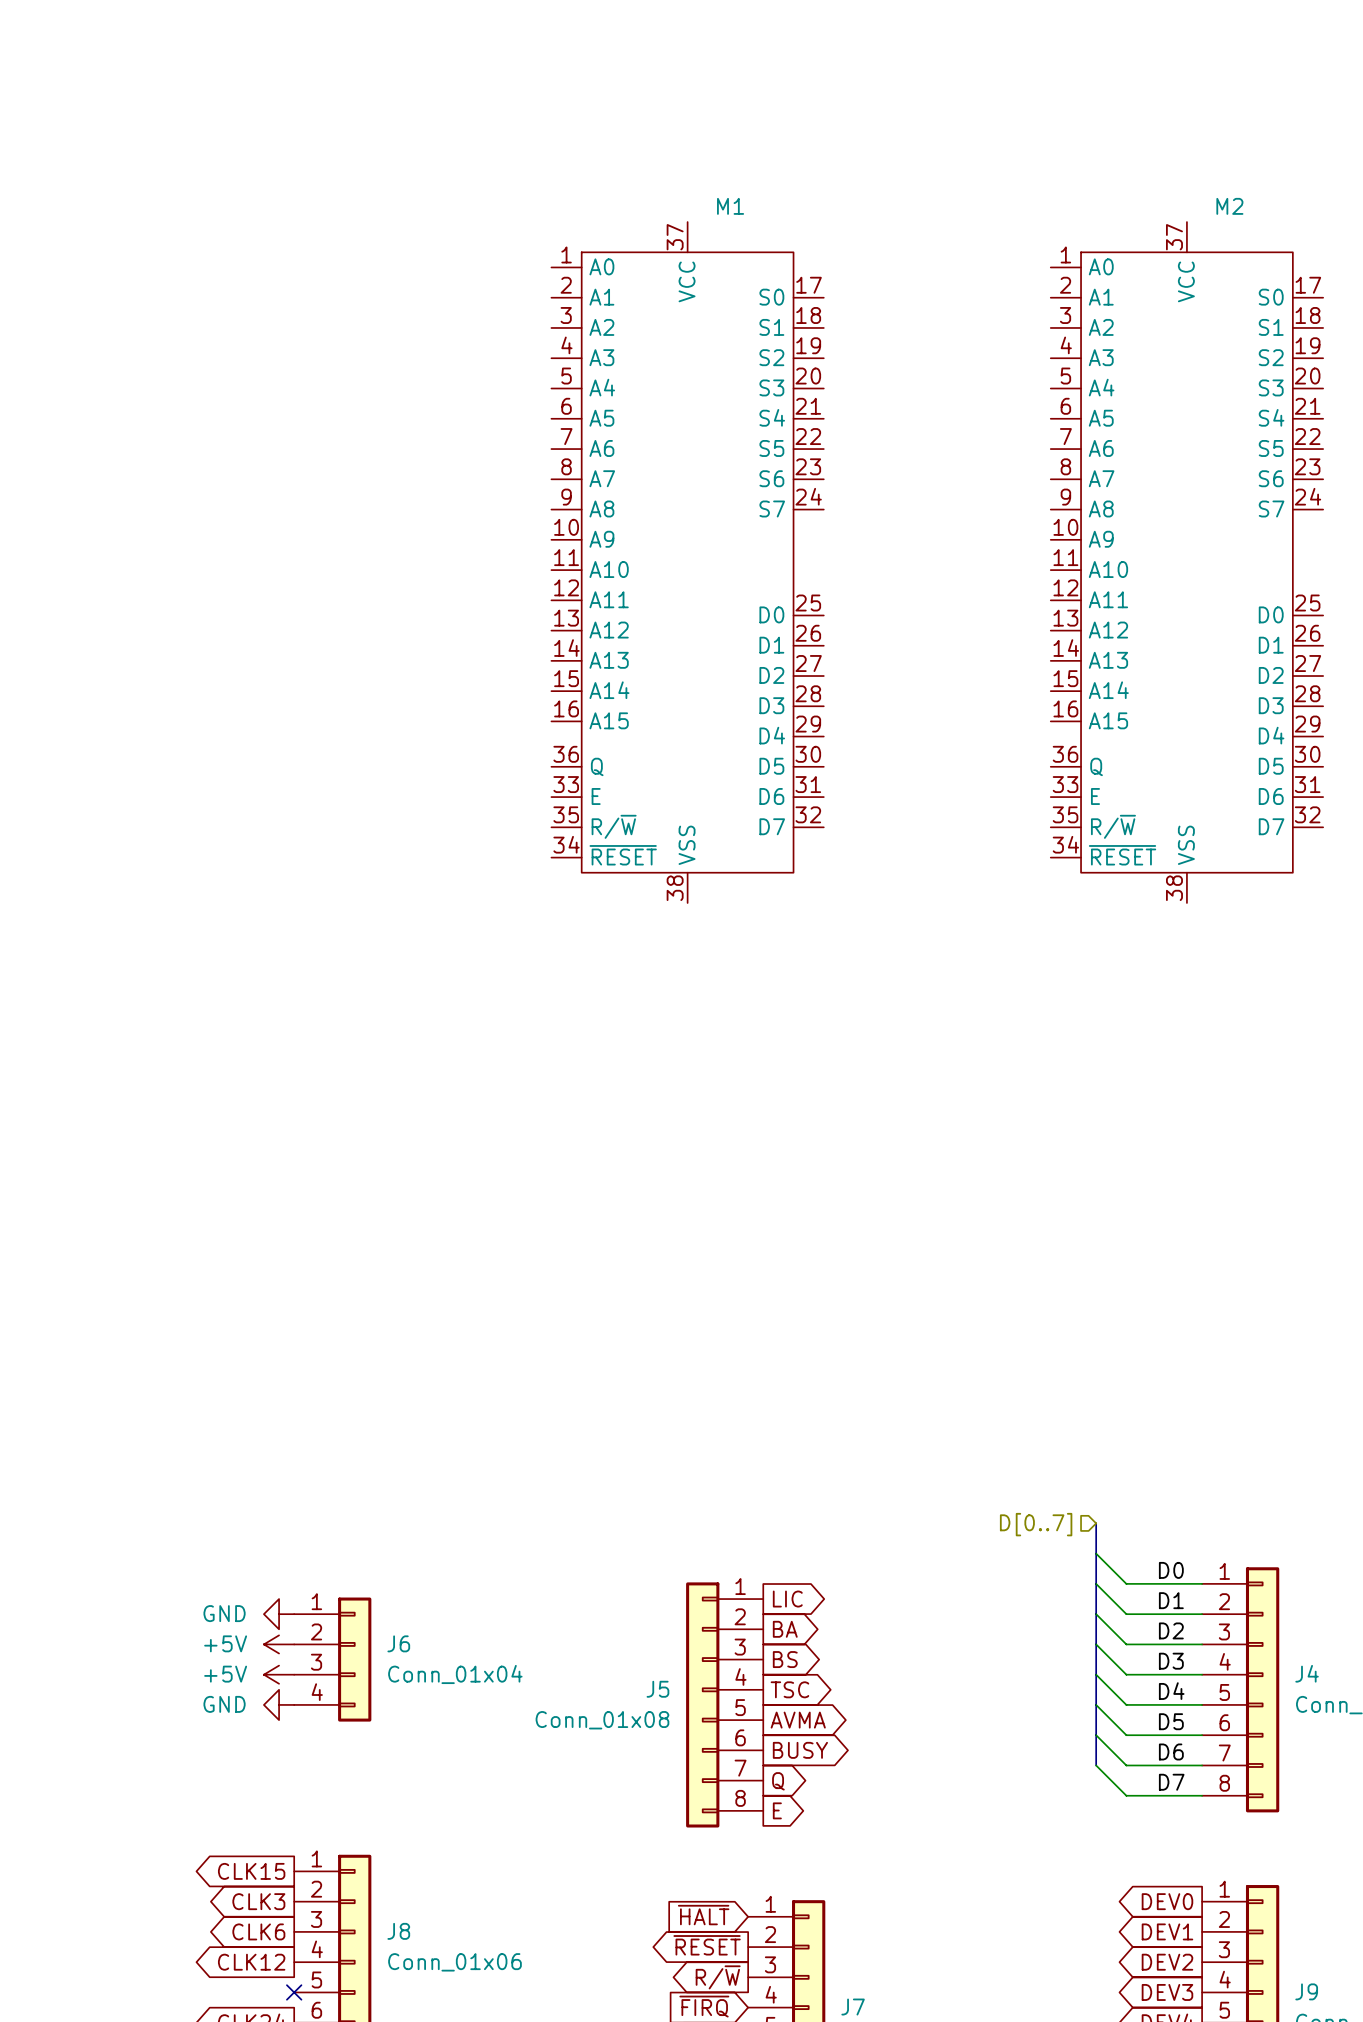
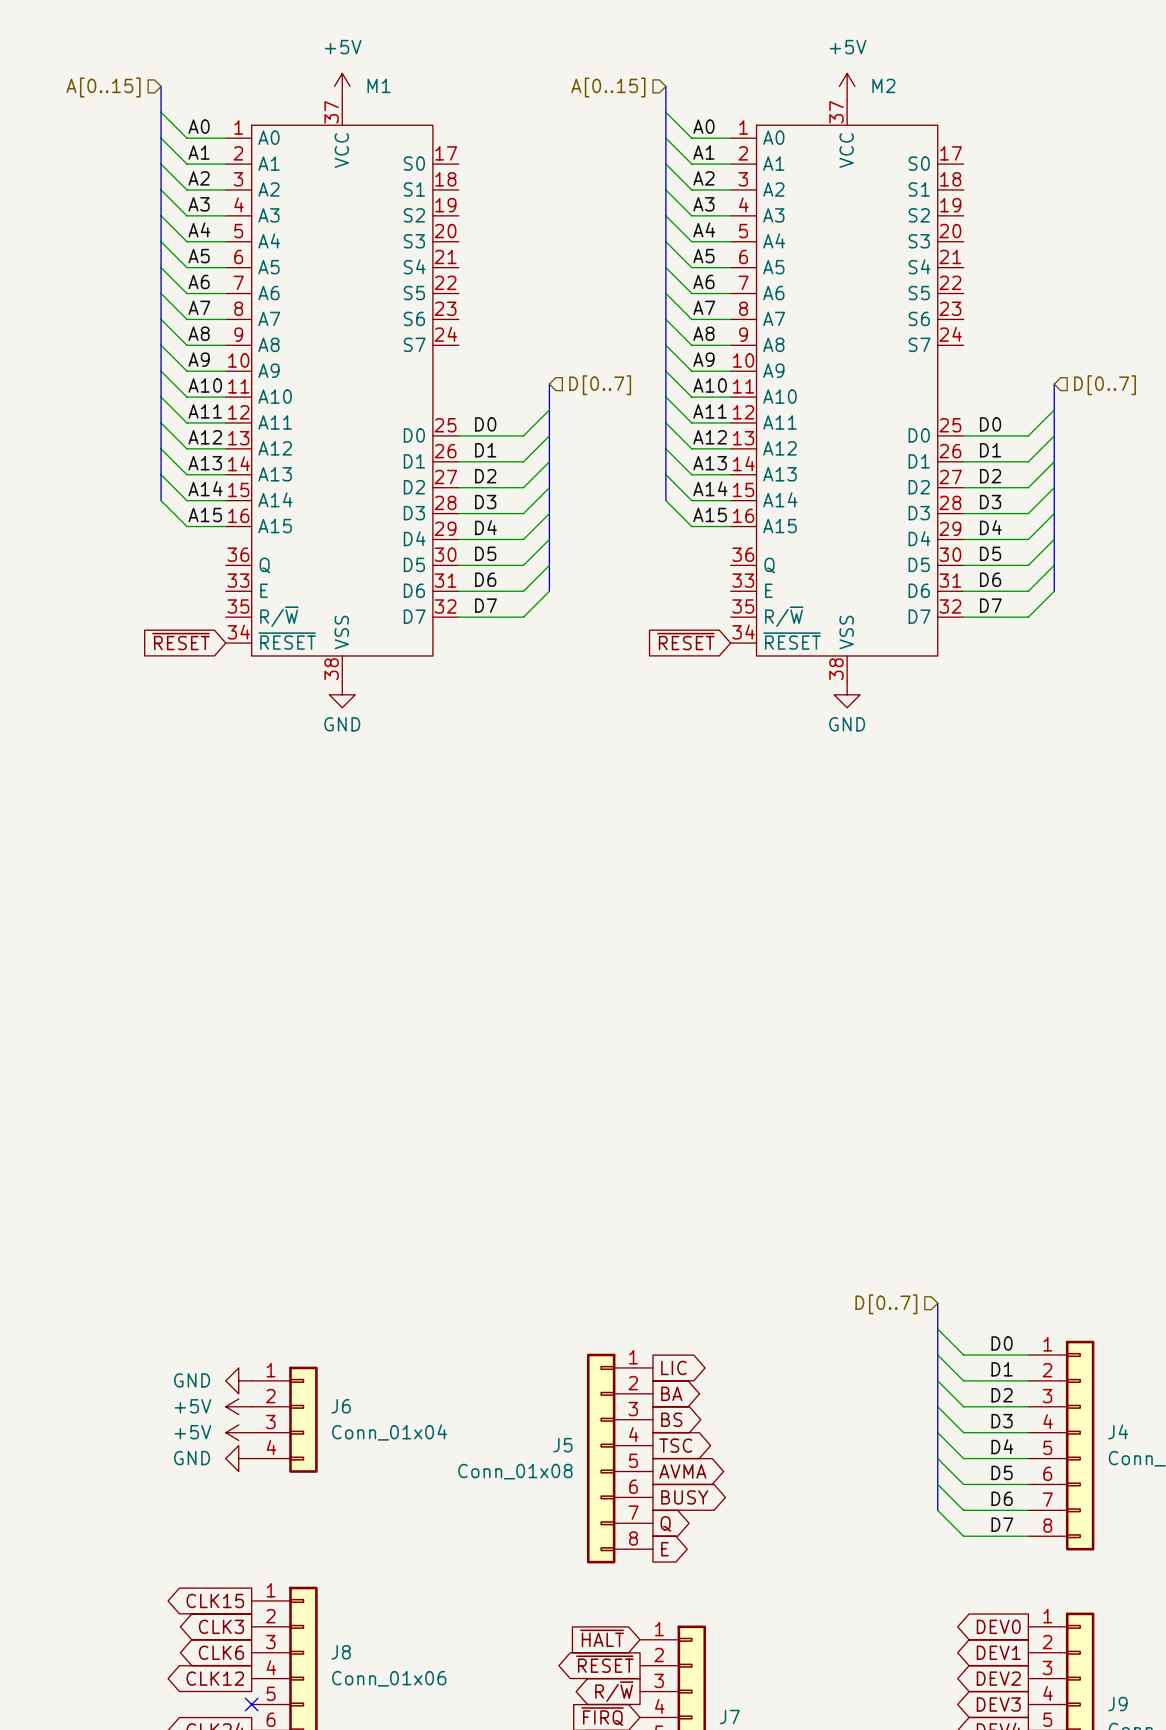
bus: none -> (161, 86) (161, 500)
power symbol: none -> +5V (342, 86)
bus: none -> (665, 86) (665, 500)
power symbol: none -> +5V (847, 86)
hierarchical label: none -> A[0..15] (103, 87)
hierarchical label: none -> A[0..15] (608, 87)
wire: none -> (161, 112) (186, 138) (225, 138)
wire: none -> (665, 112) (691, 138) (730, 138)
label: none -> A0 (199, 126)
label: none -> A0 (703, 126)
wire: none -> (161, 138) (186, 164) (225, 164)
wire: none -> (665, 138) (691, 164) (730, 164)
label: none -> A1 (199, 152)
label: none -> A1 (703, 152)
wire: none -> (161, 164) (186, 189) (225, 189)
wire: none -> (665, 164) (691, 189) (730, 189)
label: none -> A2 (199, 178)
label: none -> A2 (703, 178)
wire: none -> (161, 189) (186, 215) (225, 215)
wire: none -> (665, 189) (691, 215) (730, 215)
label: none -> A3 (199, 204)
label: none -> A3 (703, 204)
wire: none -> (161, 215) (186, 241) (225, 241)
wire: none -> (665, 215) (691, 241) (730, 241)
label: none -> A4 (199, 229)
label: none -> A4 (704, 229)
wire: none -> (161, 241) (186, 267) (225, 267)
wire: none -> (665, 241) (691, 267) (730, 267)
label: none -> A5 (199, 256)
label: none -> A5 (703, 256)
wire: none -> (161, 267) (186, 293) (225, 293)
wire: none -> (665, 267) (691, 293) (730, 293)
label: none -> A6 (199, 281)
label: none -> A6 (703, 281)
wire: none -> (161, 293) (186, 319) (225, 319)
wire: none -> (665, 293) (691, 319) (730, 319)
label: none -> A7 (199, 307)
label: none -> A7 (704, 307)
wire: none -> (161, 319) (186, 345) (225, 345)
wire: none -> (665, 319) (691, 345) (730, 345)
label: none -> A8 (199, 333)
label: none -> A8 (703, 333)
wire: none -> (161, 345) (186, 371) (225, 371)
wire: none -> (665, 345) (691, 371) (730, 371)
label: none -> A9 (199, 359)
label: none -> A9 (703, 359)
wire: none -> (161, 371) (186, 397) (225, 397)
wire: none -> (665, 371) (691, 397) (730, 397)
bus: none -> (549, 384) (549, 591)
bus: none -> (1054, 384) (1054, 591)
label: none -> A10 (205, 385)
hierarchical label: none -> D[0..7] (600, 385)
label: none -> A10 (710, 385)
hierarchical label: none -> D[0..7] (1105, 385)
wire: none -> (161, 397) (186, 422) (225, 422)
wire: none -> (665, 397) (691, 422) (730, 422)
wire: none -> (549, 410) (523, 435) (458, 435)
wire: none -> (1054, 410) (1028, 435) (963, 435)
label: none -> A11 (205, 411)
label: none -> A11 (710, 411)
wire: none -> (161, 422) (186, 448) (225, 448)
wire: none -> (665, 422) (691, 448) (730, 448)
label: none -> D0 (485, 424)
label: none -> D0 (990, 424)
wire: none -> (549, 435) (523, 461) (458, 461)
wire: none -> (1054, 435) (1028, 461) (963, 461)
label: none -> A12 (205, 437)
label: none -> A12 (710, 437)
wire: none -> (161, 448) (186, 474) (225, 474)
wire: none -> (665, 448) (691, 474) (730, 474)
label: none -> D1 (485, 450)
label: none -> D1 (990, 450)
wire: none -> (549, 461) (523, 487) (458, 487)
wire: none -> (1054, 461) (1028, 487) (963, 487)
label: none -> A13 (205, 463)
label: none -> A13 (710, 463)
wire: none -> (161, 474) (186, 500) (225, 500)
wire: none -> (665, 474) (691, 500) (730, 500)
label: none -> D2 (485, 476)
label: none -> D2 (990, 476)
M1 position: (687, 562) -> (342, 390)
M2 position: (1186, 562) -> (847, 390)
wire: none -> (549, 487) (523, 513) (458, 513)
wire: none -> (1054, 487) (1028, 513) (963, 513)
label: none -> A14 (205, 488)
label: none -> A14 (710, 488)
wire: none -> (161, 500) (186, 526) (225, 526)
wire: none -> (665, 500) (691, 526) (730, 526)
label: none -> D3 (485, 502)
label: none -> D3 (990, 502)
wire: none -> (549, 513) (523, 539) (458, 539)
wire: none -> (1054, 513) (1028, 539) (963, 539)
label: none -> A15 (205, 514)
label: none -> A15 (710, 514)
label: none -> D4 (486, 527)
label: none -> D4 (990, 527)
wire: none -> (549, 539) (523, 565) (458, 565)
wire: none -> (1054, 539) (1028, 565) (963, 565)
label: none -> D5 (485, 553)
label: none -> D5 (990, 553)
wire: none -> (549, 565) (523, 591) (458, 591)
wire: none -> (1054, 565) (1028, 591) (963, 591)
label: none -> D6 (485, 579)
label: none -> D6 (990, 579)
wire: none -> (549, 591) (523, 617) (458, 617)
wire: none -> (1054, 591) (1028, 617) (963, 617)
label: none -> D7 (486, 605)
label: none -> D7 (990, 605)
global label: none -> ~{RESET} (180, 641)
global label: none -> ~{RESET} (685, 641)
power symbol: none -> GND (342, 694)
power symbol: none -> GND (847, 694)

